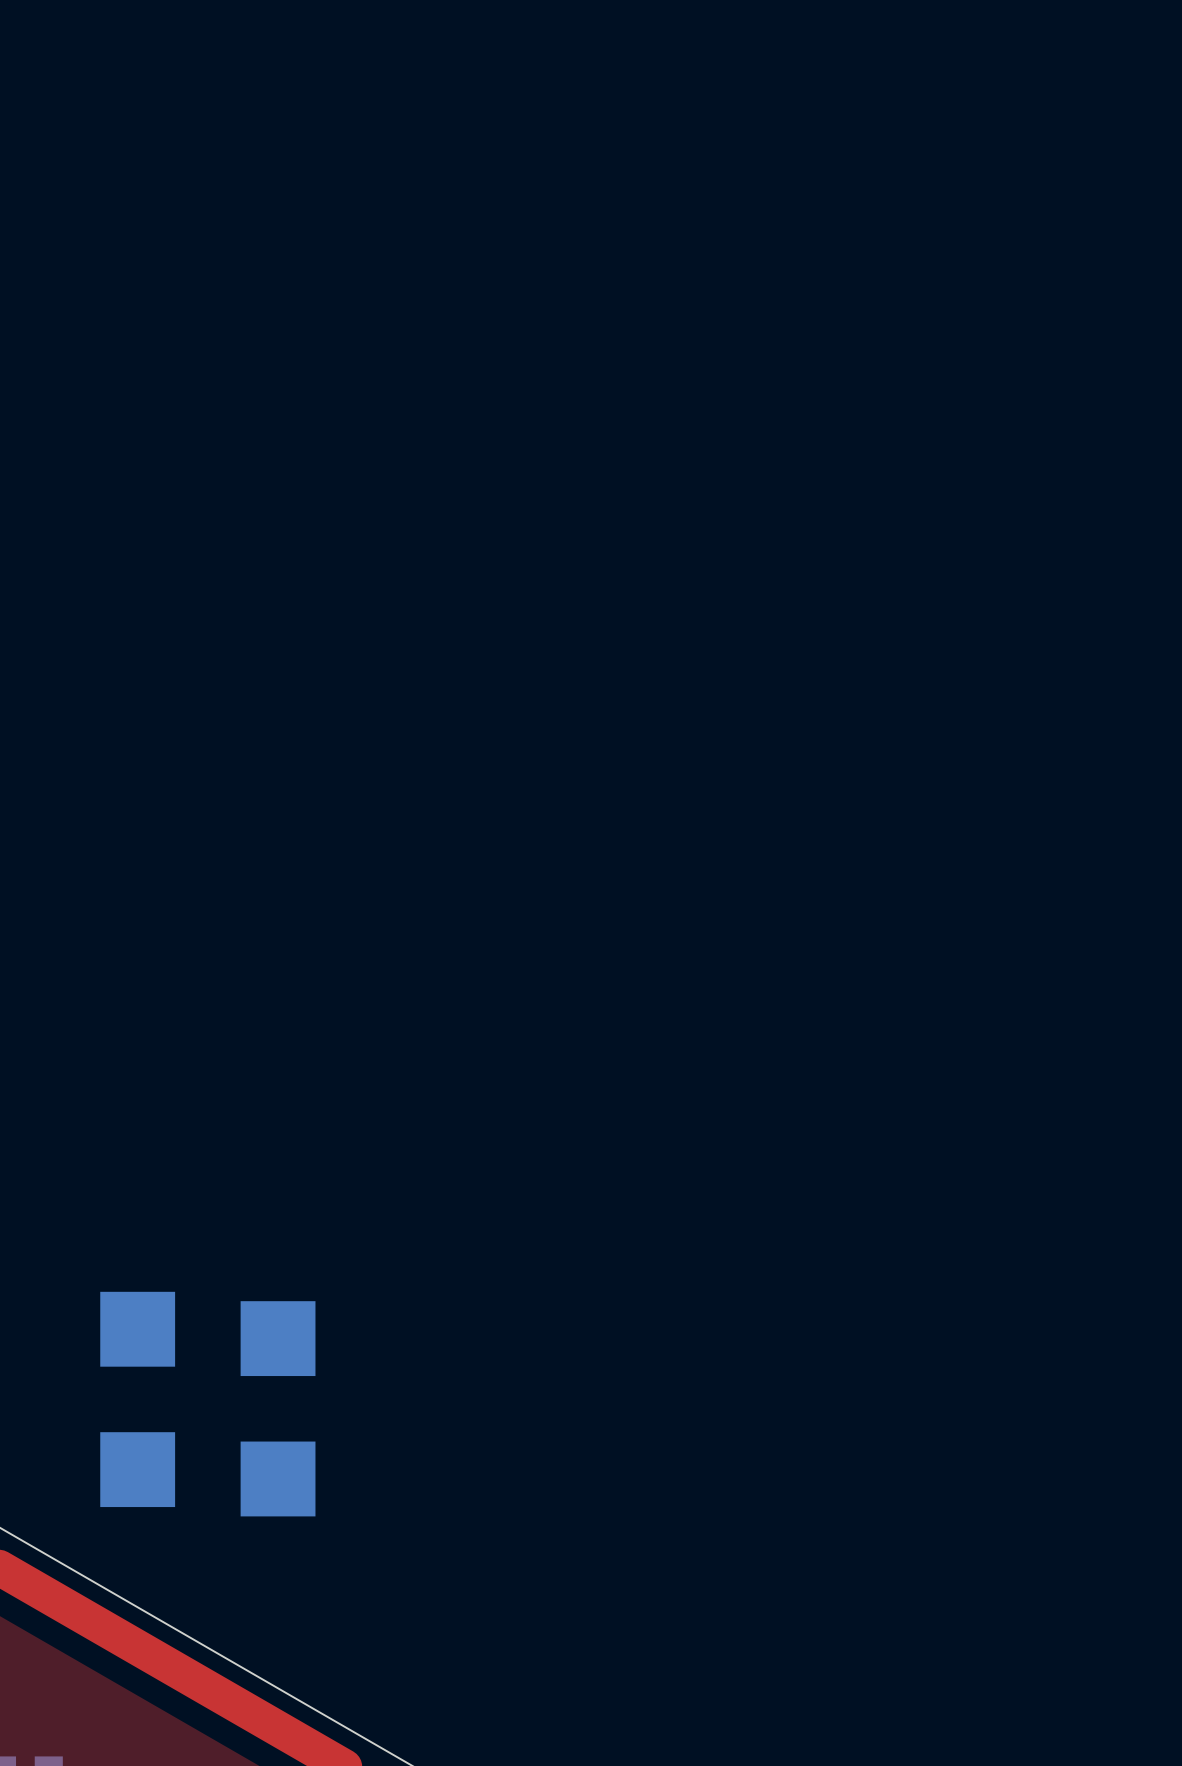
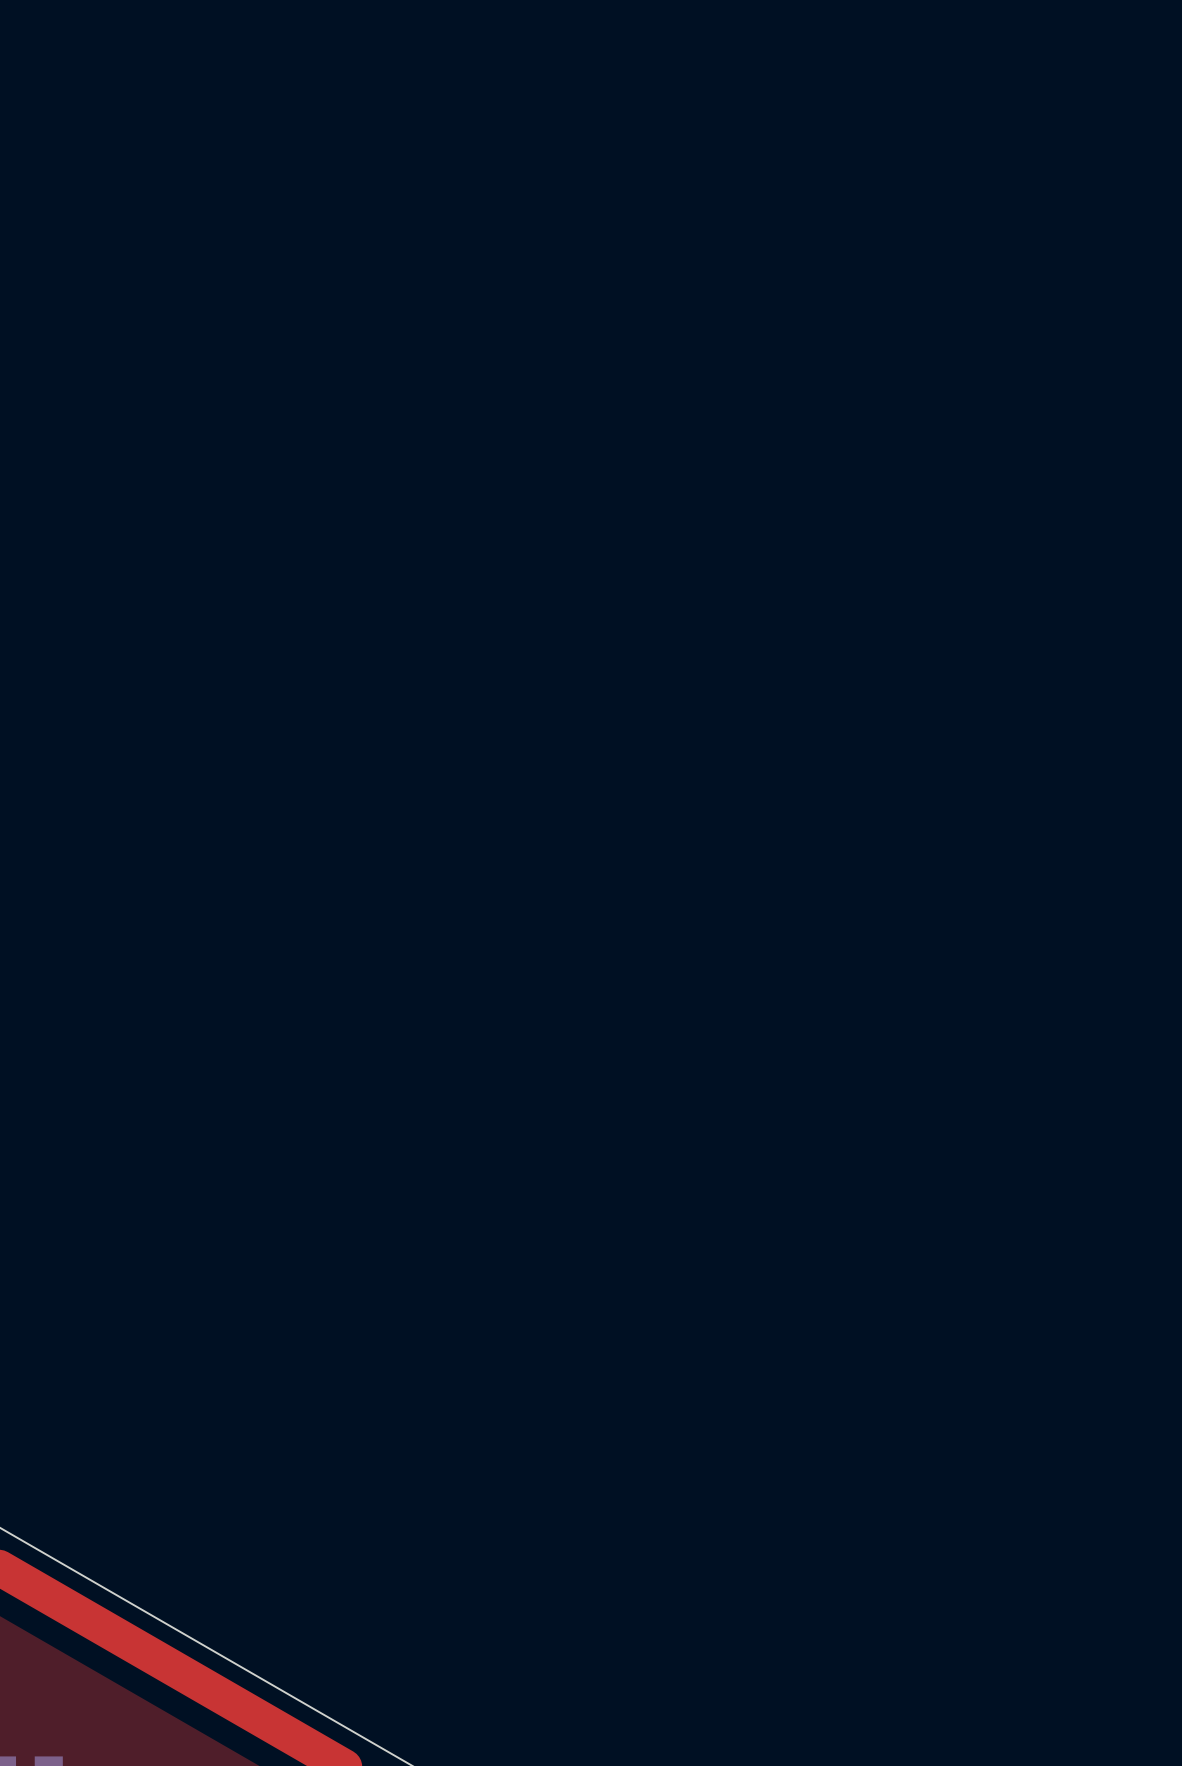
part: (137, 1399) -> none
part: (278, 1408) -> none

